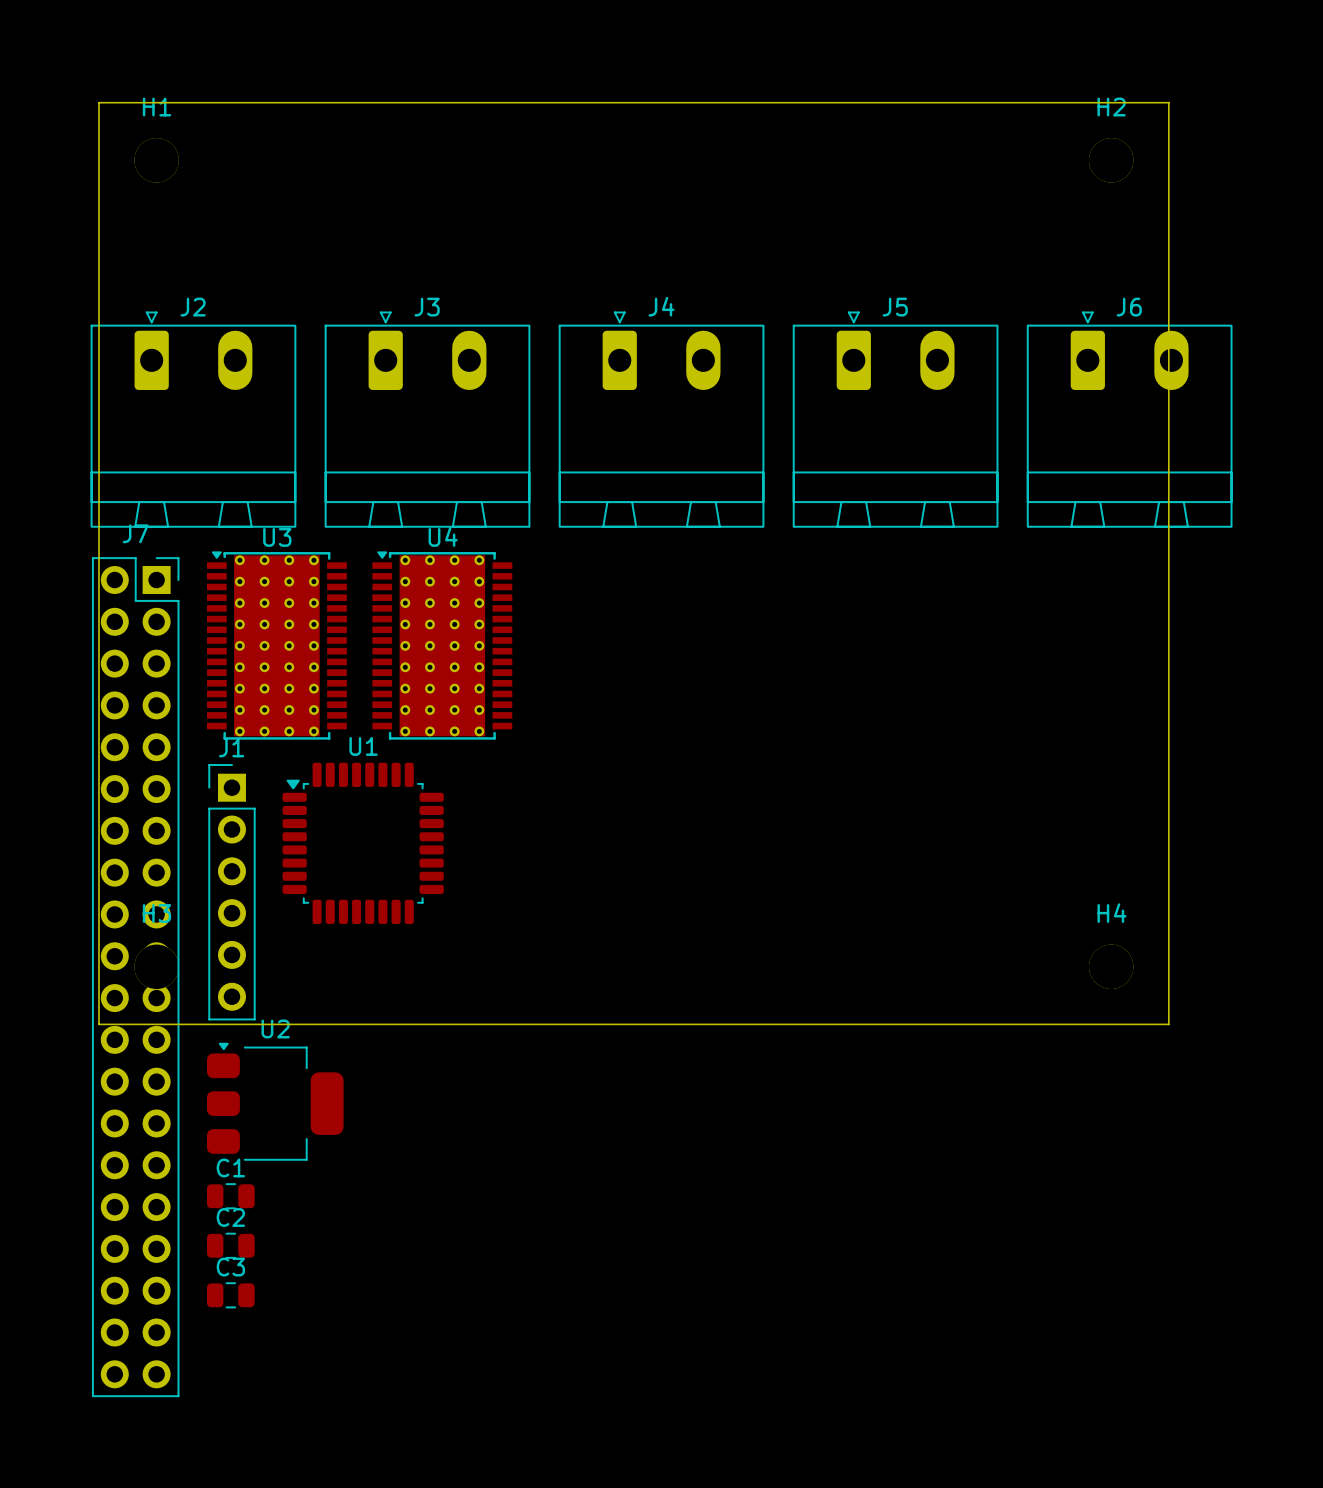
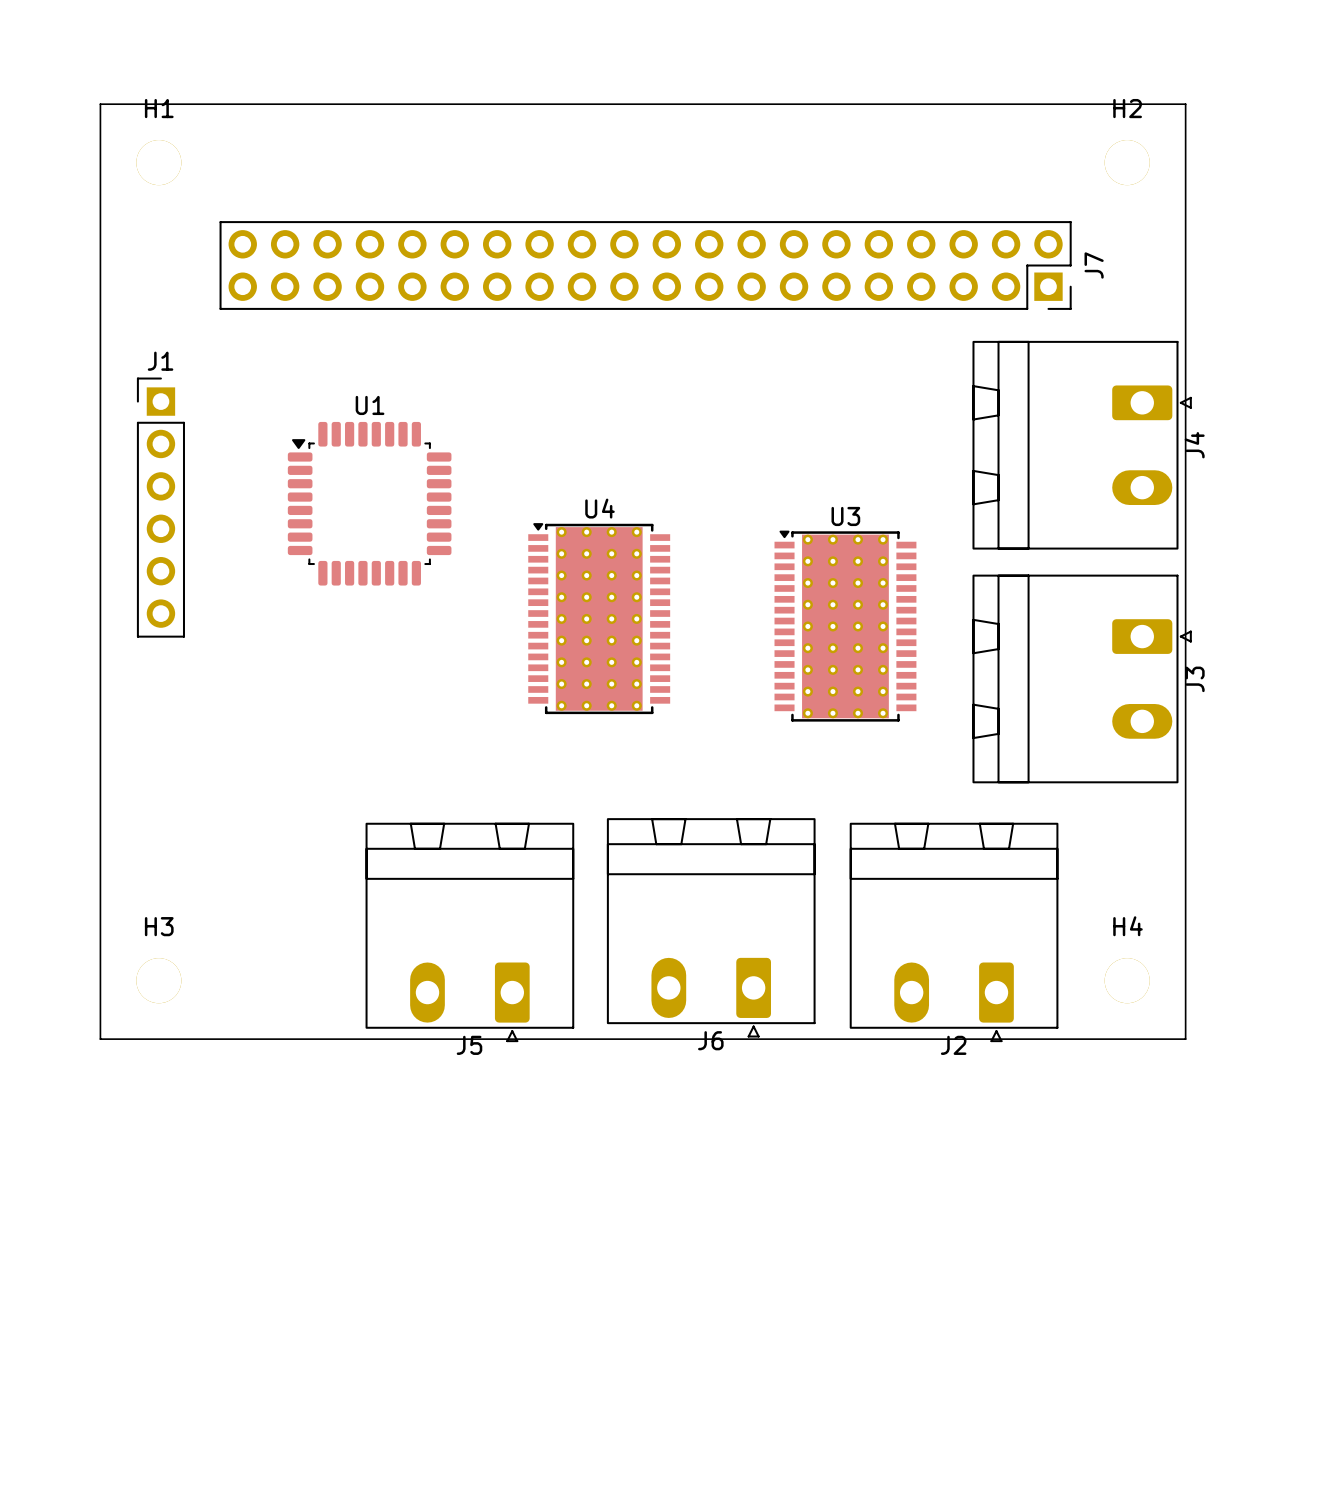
J2 rotation: 0° (193, 419) -> 180° (954, 932)
J2 position: (193, 419) -> (954, 932)
J3 rotation: 0° (427, 419) -> 90° clockwise (1082, 678)
J3 position: (427, 419) -> (1082, 678)
J4 rotation: 0° (661, 419) -> 90° clockwise (1082, 445)
J4 position: (661, 419) -> (1082, 445)
J5 rotation: 0° (895, 419) -> 180° (469, 932)
J5 position: (895, 419) -> (469, 932)
J6 rotation: 0° (1129, 419) -> 180° (711, 927)
J6 position: (1129, 419) -> (711, 927)
U3 position: (276, 645) -> (845, 626)
U4 position: (442, 645) -> (599, 618)
U1 position: (363, 843) -> (369, 503)
J1 position: (231, 892) -> (160, 507)
J7 rotation: 0° (135, 977) -> 90° clockwise (645, 265)
J7 position: (135, 977) -> (645, 265)
U2: (275, 1101) -> none
C1: (230, 1196) -> none
C2: (230, 1245) -> none
C3: (230, 1295) -> none

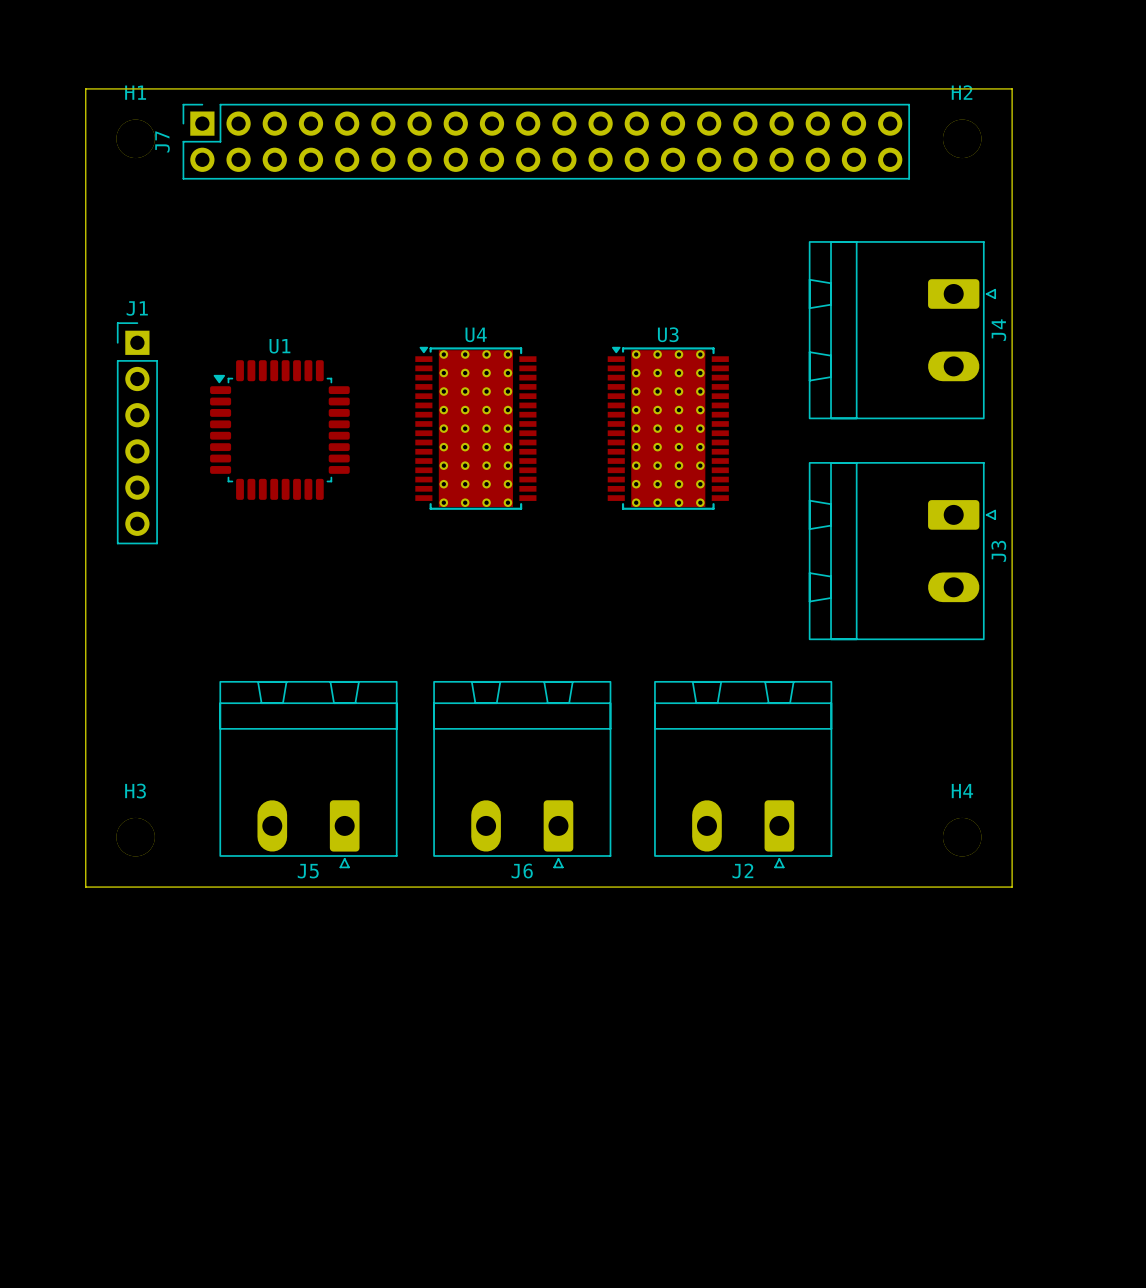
J7 rotation: 0° (645, 265) -> 180° (546, 141)
J4 position: (1082, 445) -> (902, 330)
U1 position: (369, 503) -> (279, 430)
U4 position: (599, 618) -> (475, 428)
U3 position: (845, 626) -> (668, 428)
J3 position: (1082, 678) -> (902, 551)
J6 position: (711, 927) -> (522, 774)
J5 position: (469, 932) -> (308, 774)
J2 position: (954, 932) -> (743, 774)

